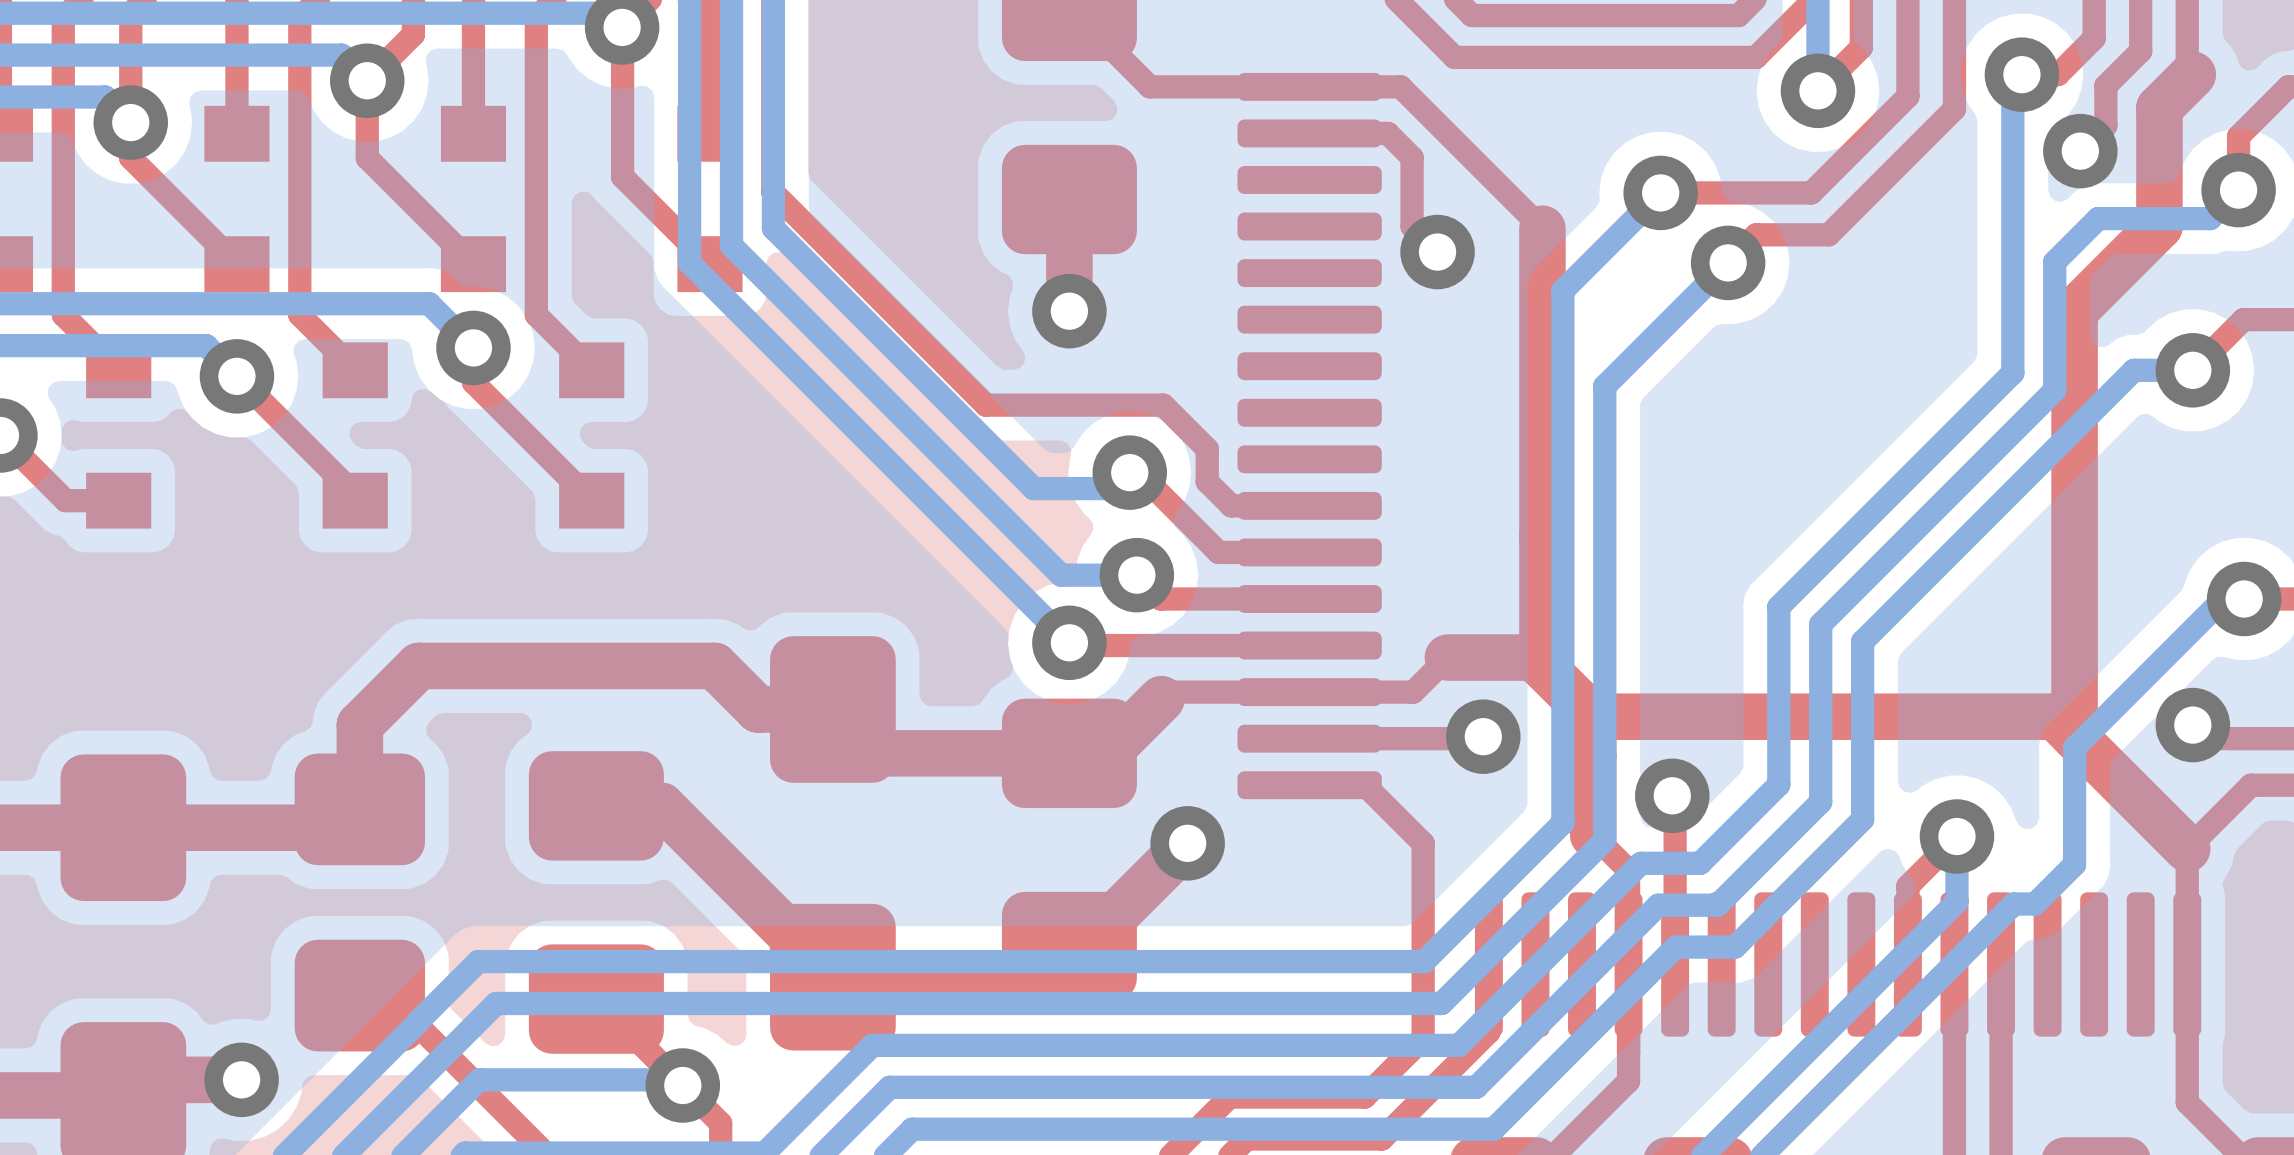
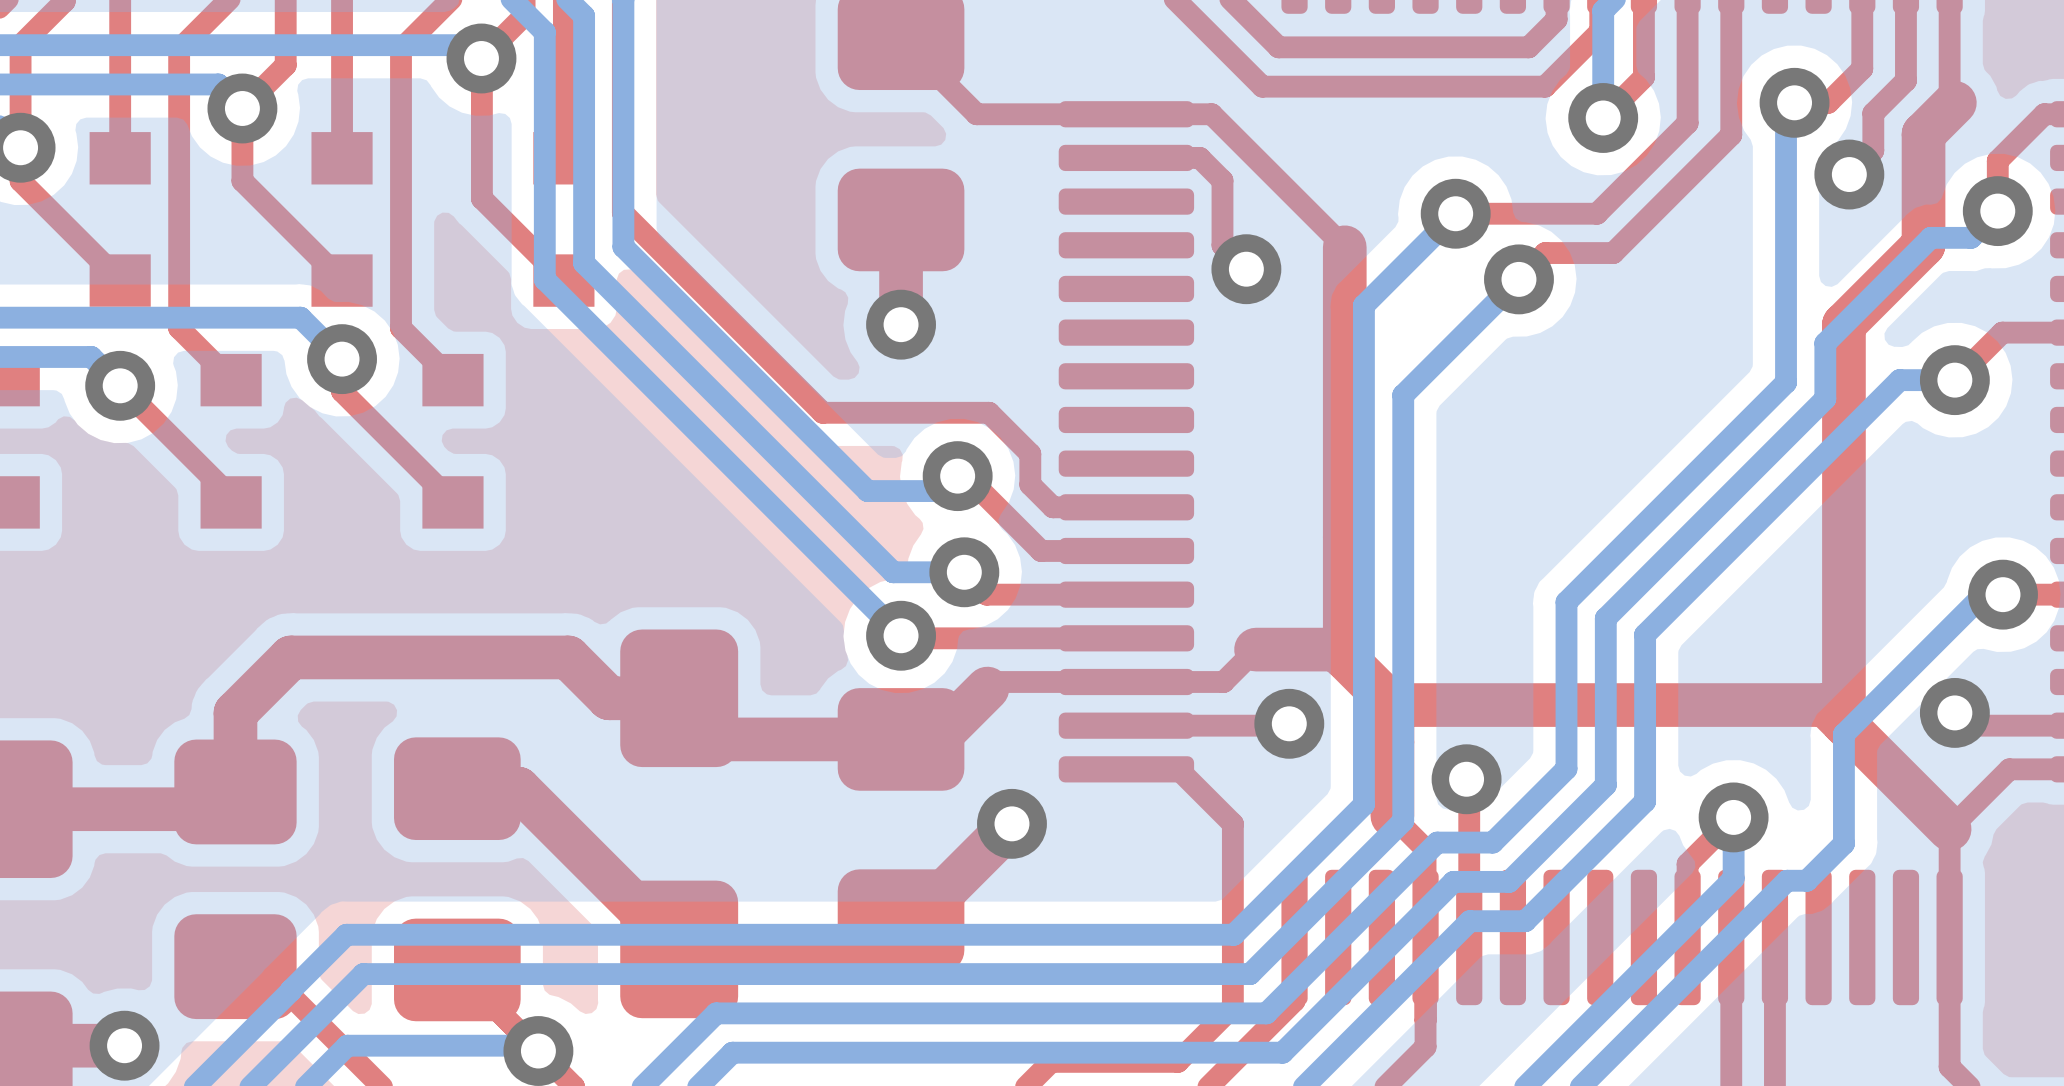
bottom track: (2167, 218) (2098, 218) (2054, 261) (2054, 331) -> (1930, 237) (1825, 343)

